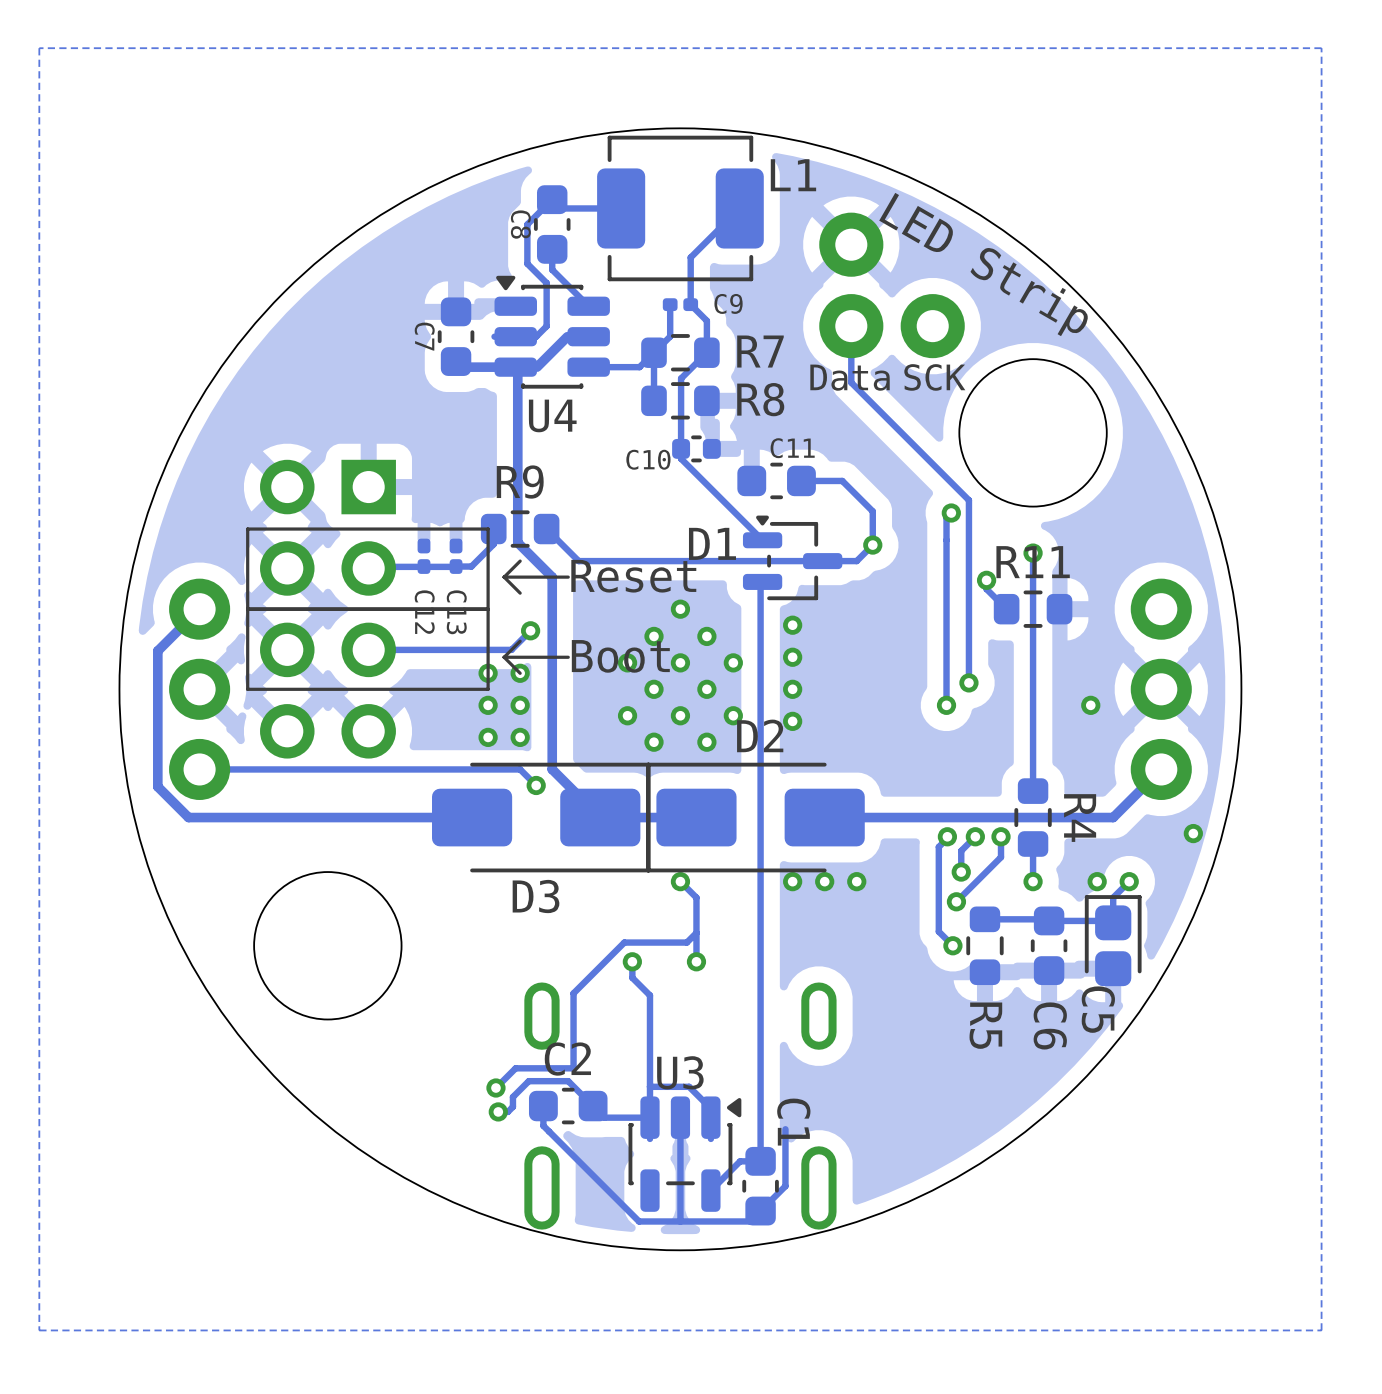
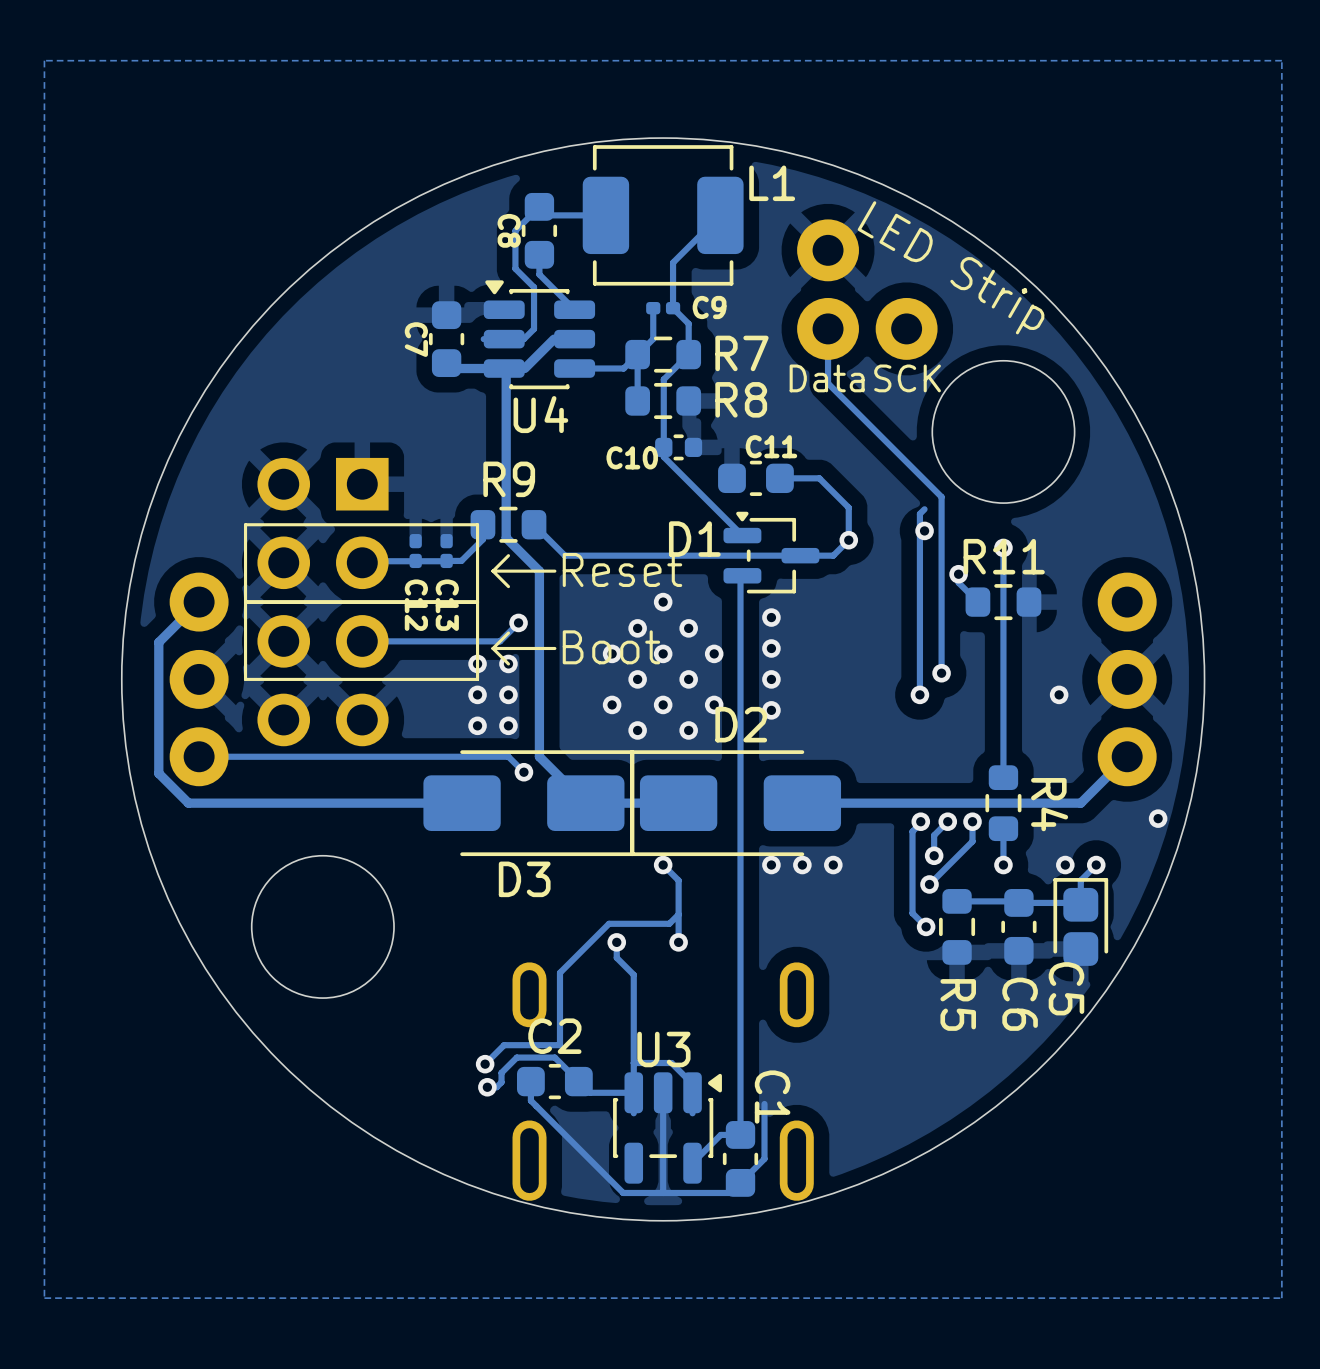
via position: (951, 513) -> (924, 530)

